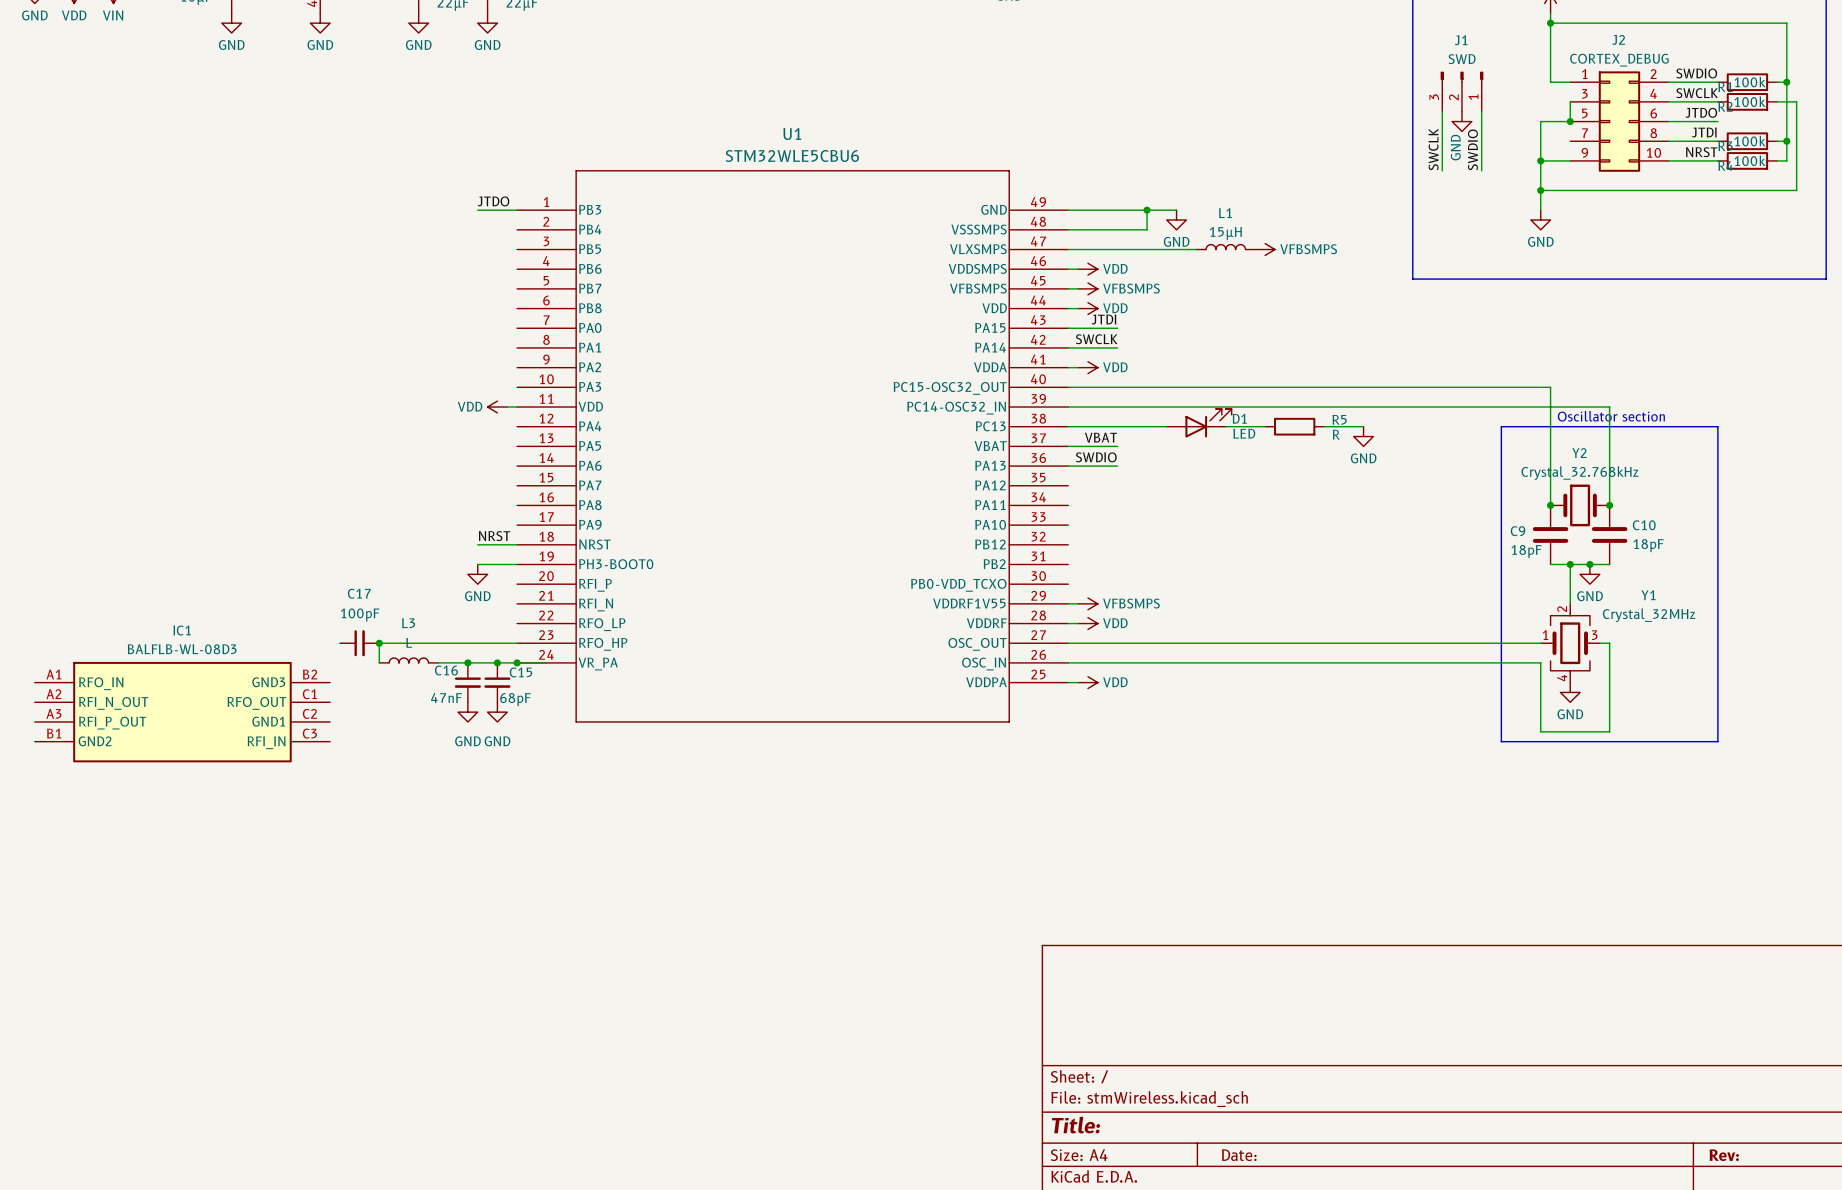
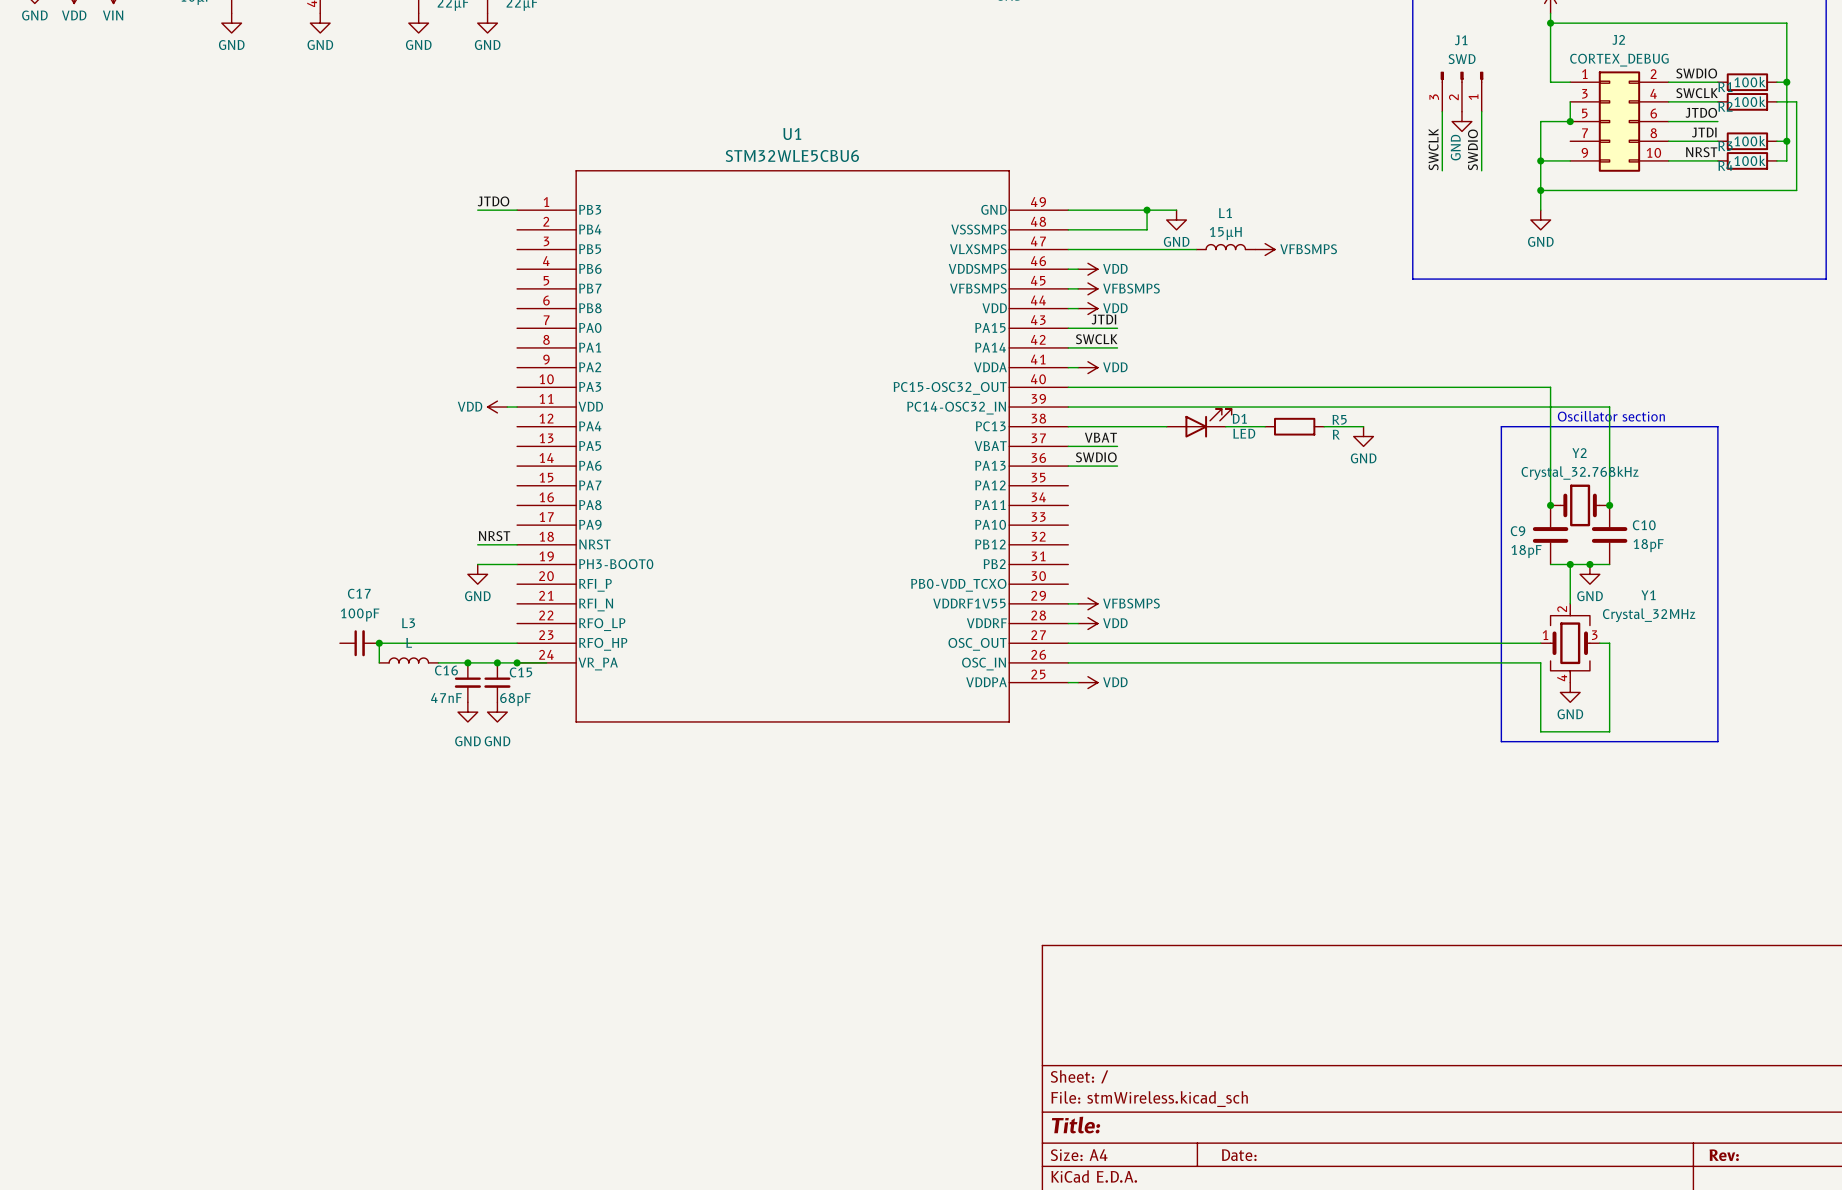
IC1: BALFLB-WL-08D3 (182, 712) -> none

